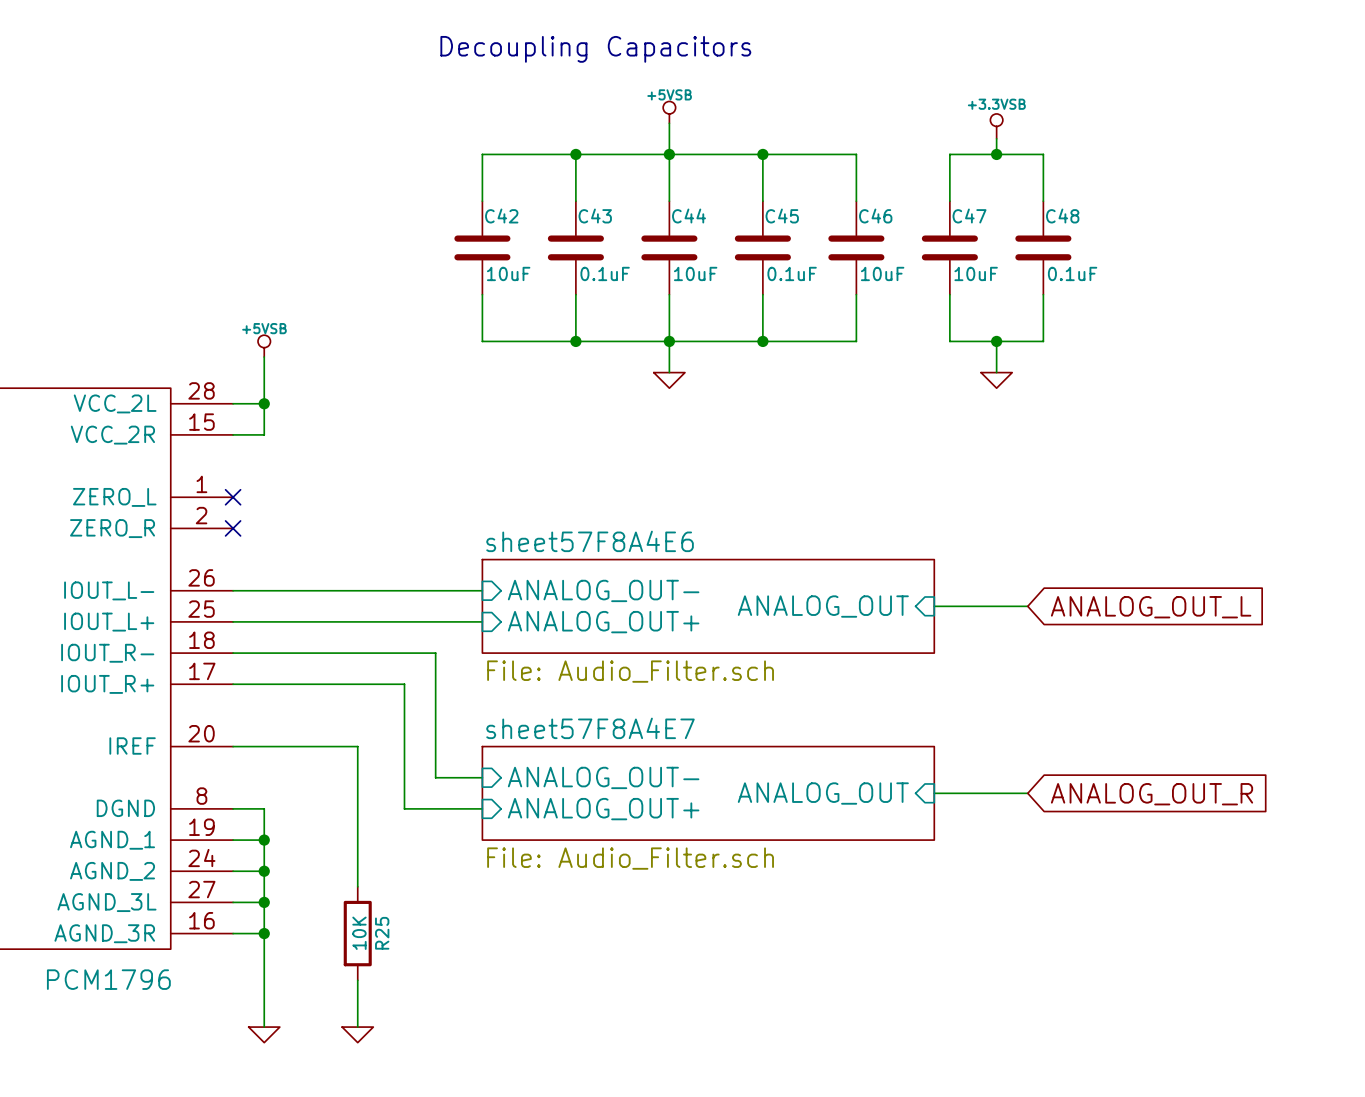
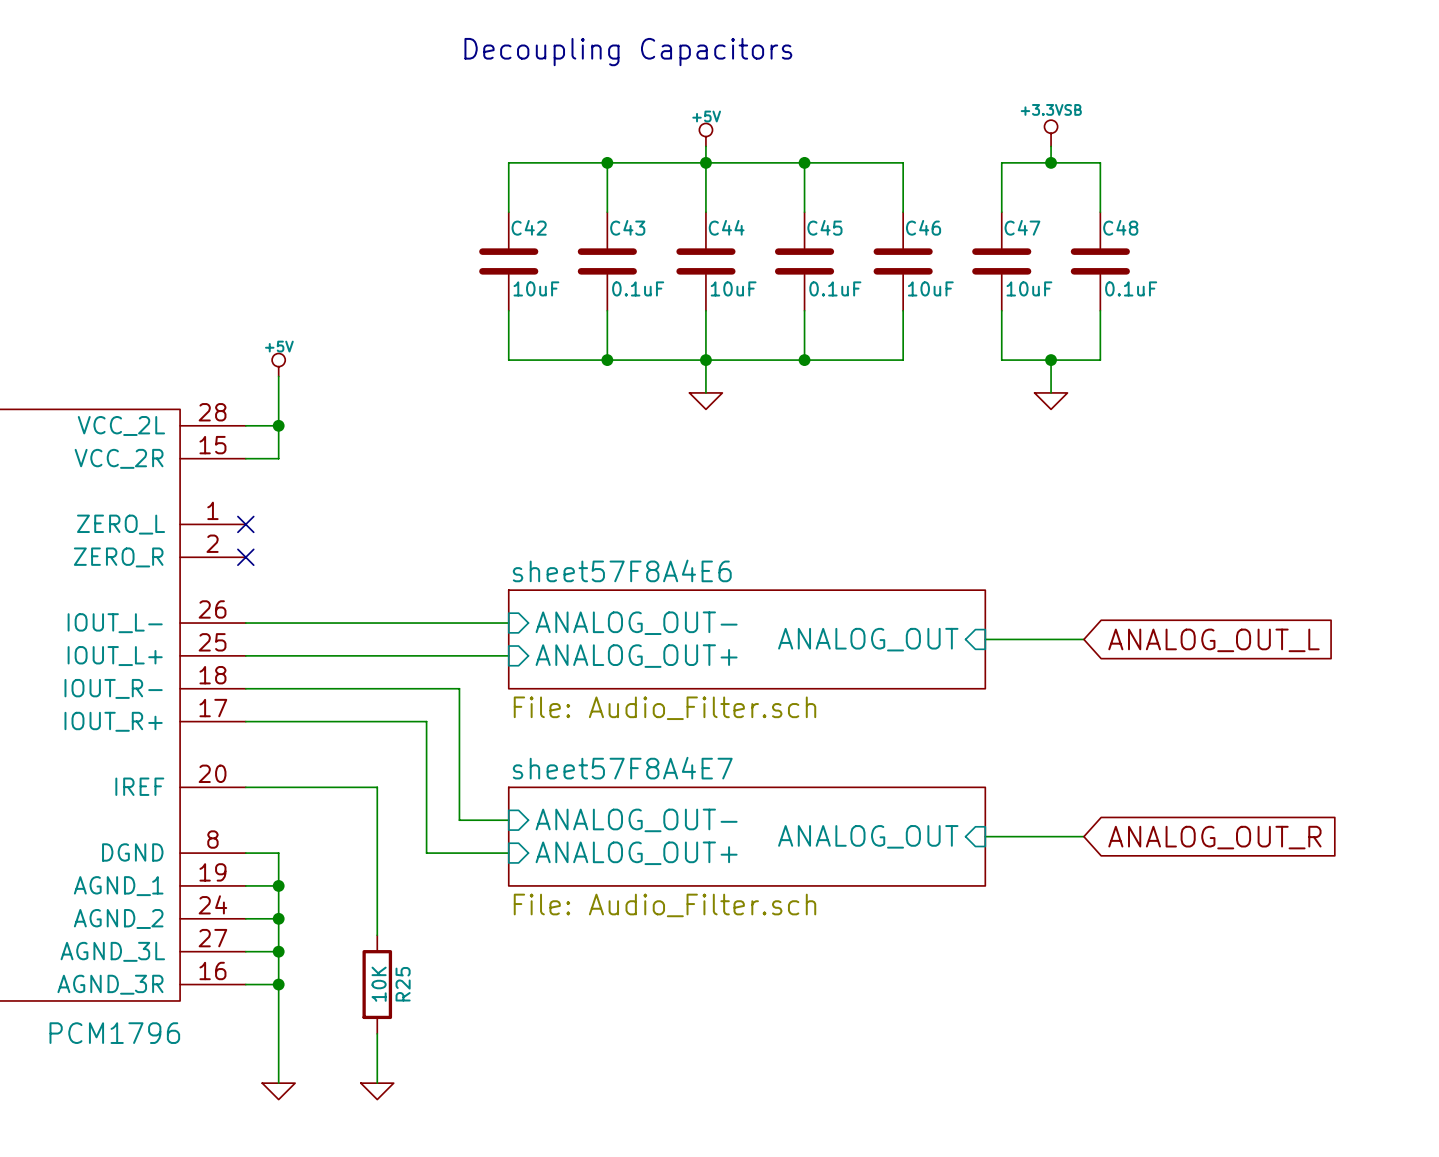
power symbol: +5VSB (669, 112) -> none
power symbol: none -> +5V (705, 134)
power symbol: +5VSB (264, 346) -> +5V (278, 365)

